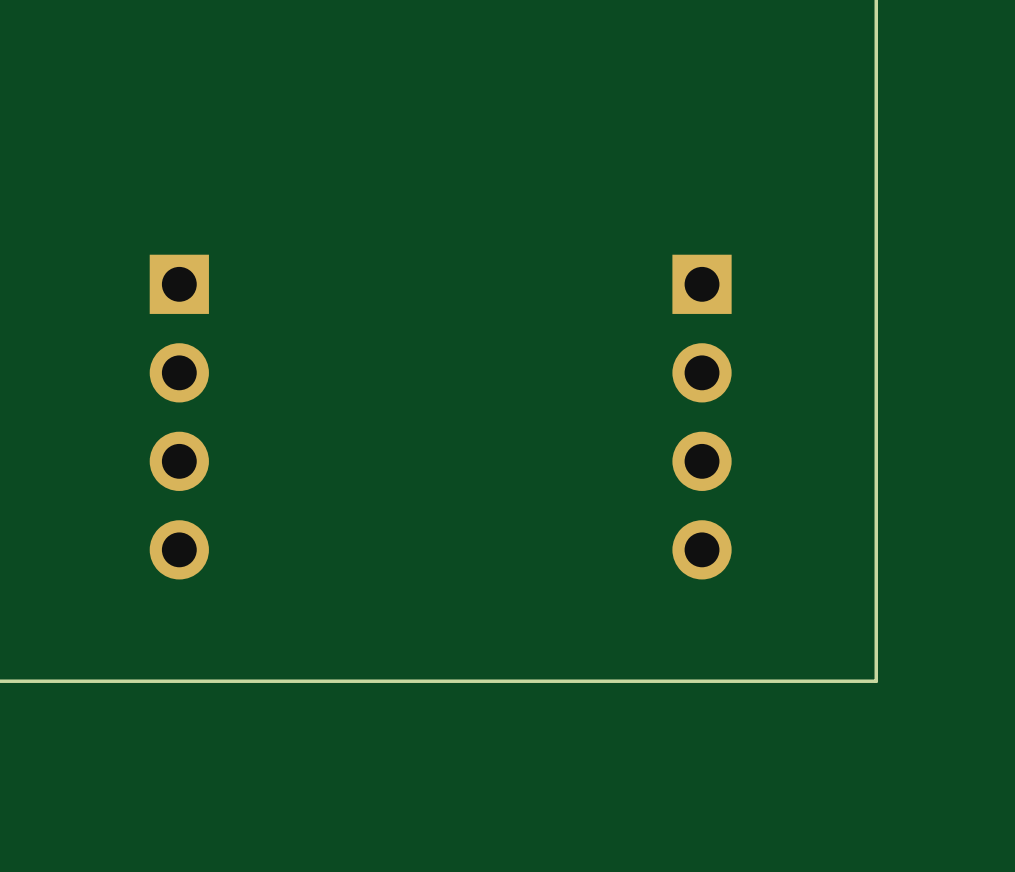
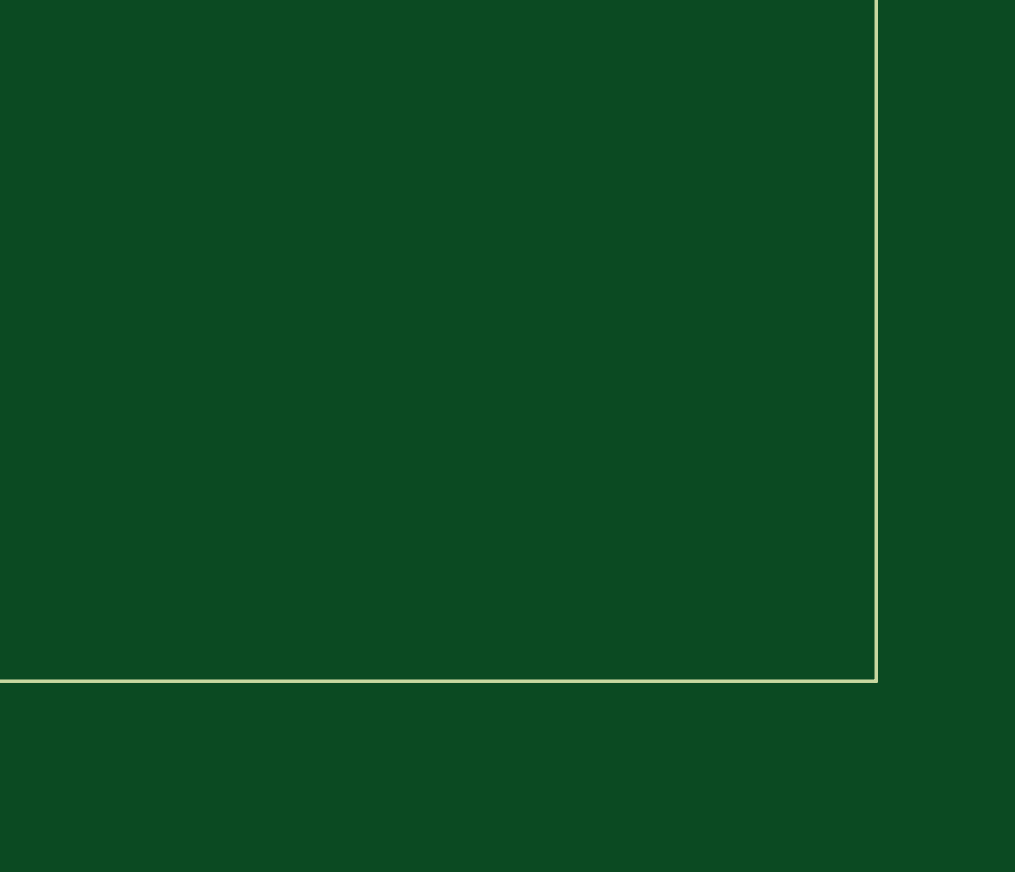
part: (179, 417) -> none
part: (702, 417) -> none

